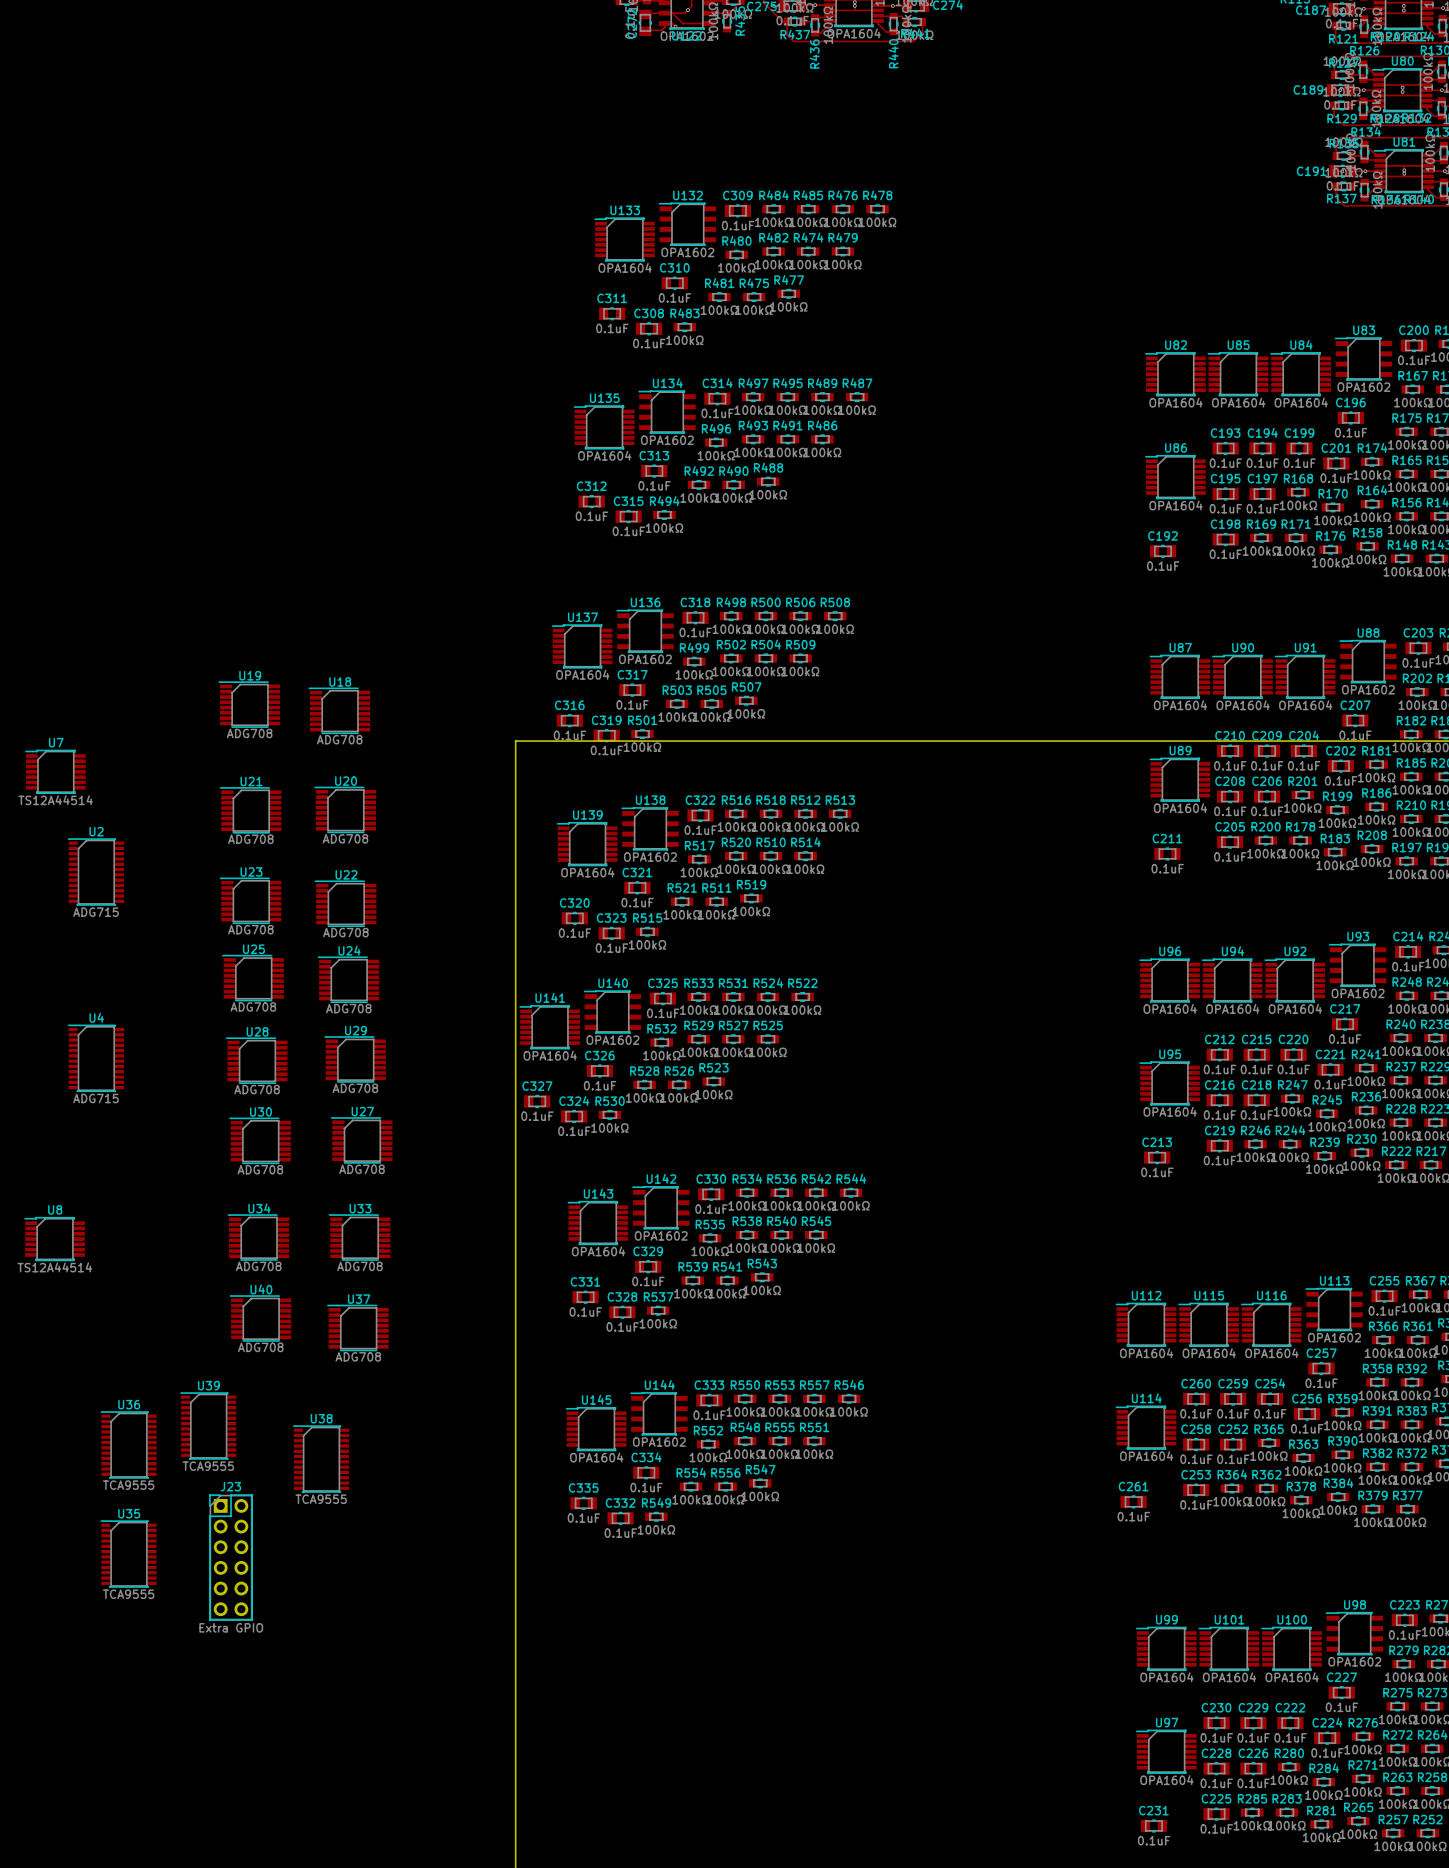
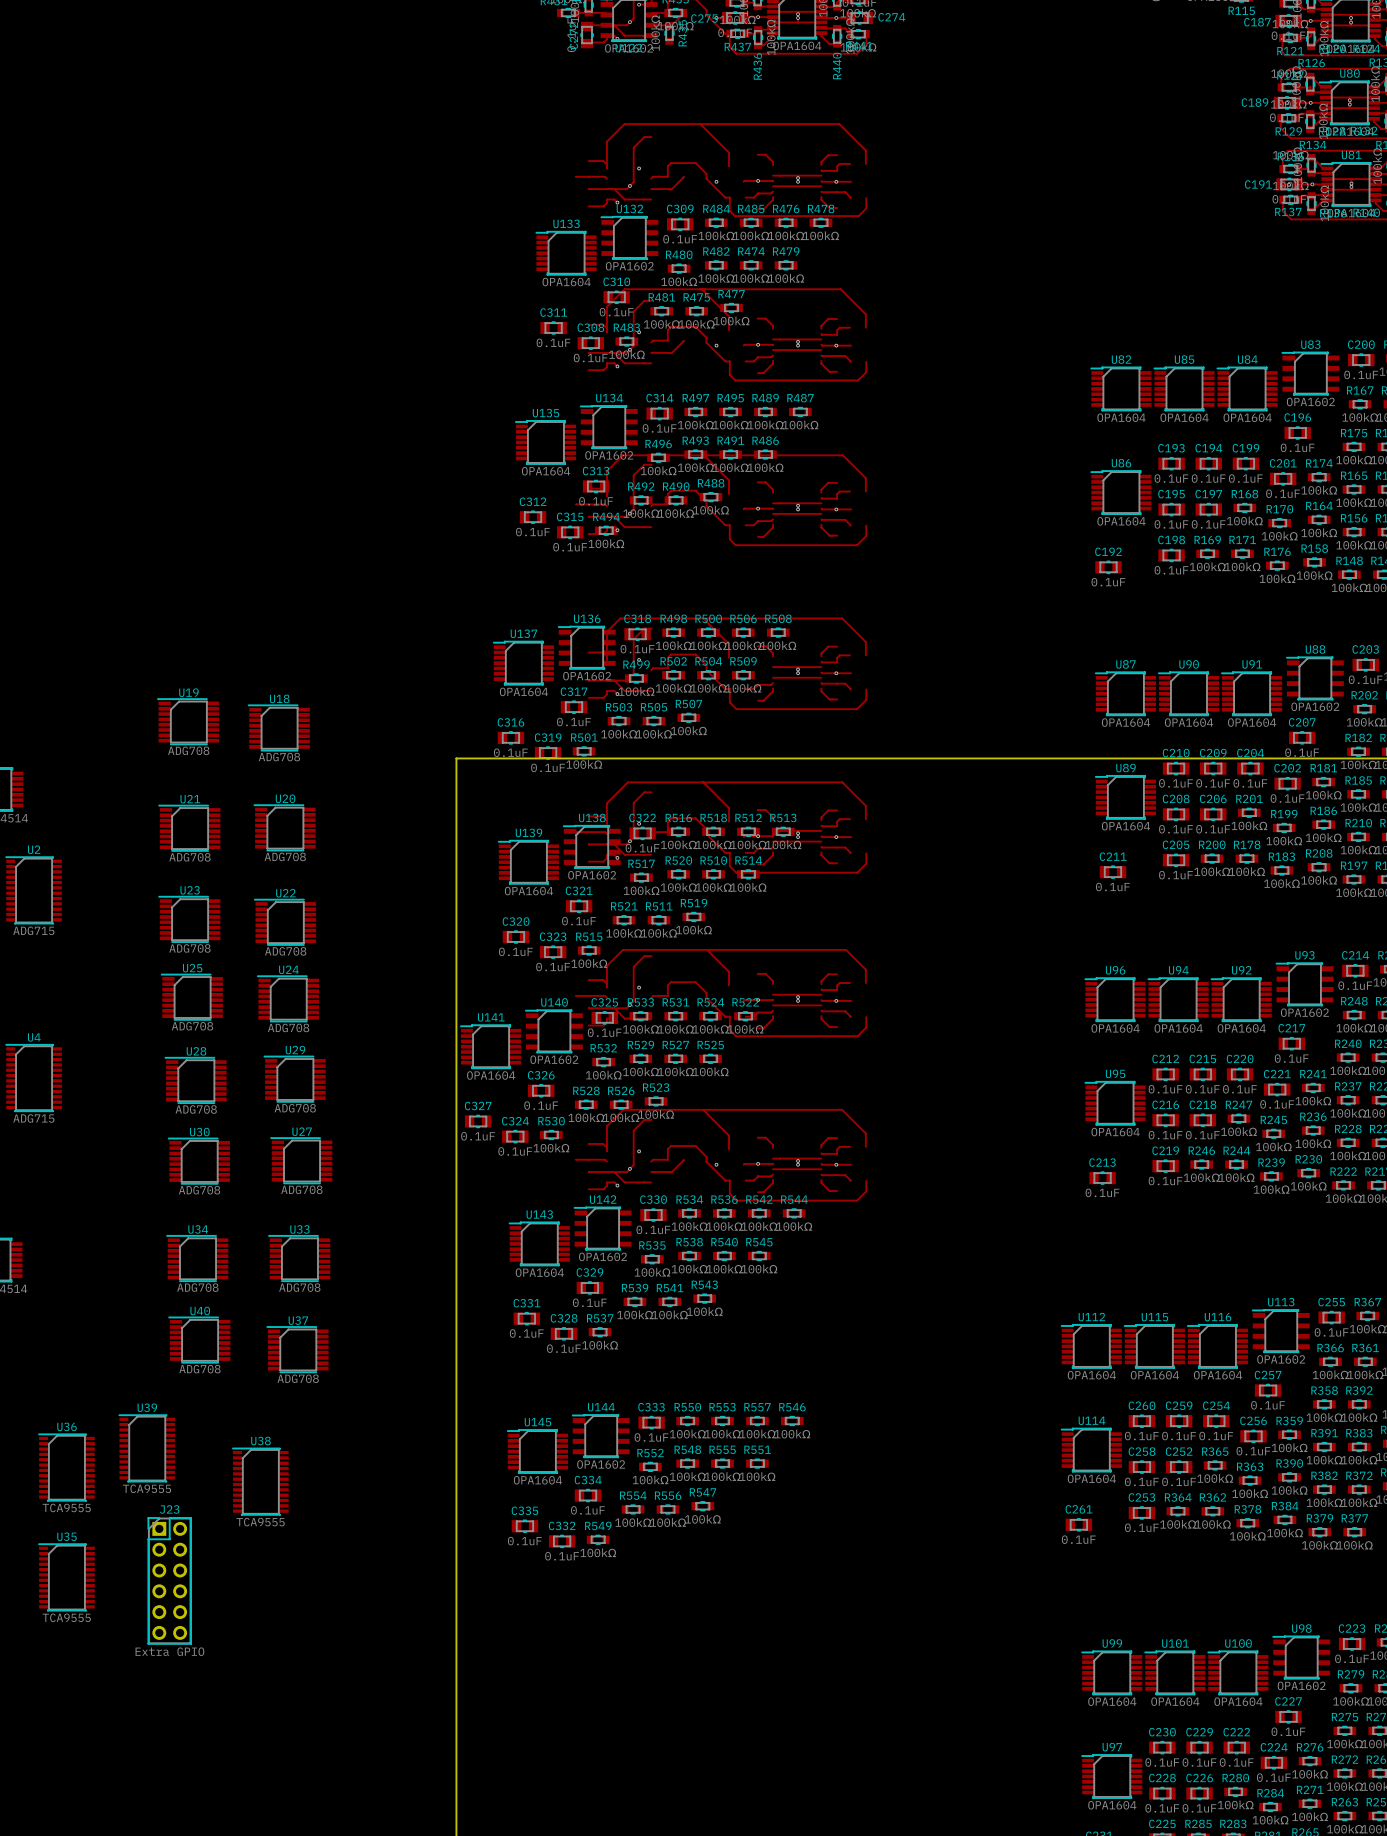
top track: none -> (700, 124) (729, 152) (729, 166)
top track: none -> (651, 137) (644, 137) (633, 147) (633, 182) (626, 189) (588, 189)
top track: none -> (757, 154) (765, 154) (773, 162) (773, 164)
top track: none -> (837, 155) (828, 155) (821, 162) (821, 164)
top track: none -> (588, 161) (603, 161) (606, 164)
top track: none -> (850, 163) (839, 163) (837, 166) (837, 170) (821, 170)
top track: none -> (865, 163) (865, 150) (839, 124) (624, 124) (606, 141) (606, 168)
via: none -> (639, 168)
top track: none -> (773, 175) (821, 175)
top track: none -> (576, 176) (605, 176) (606, 178)
top track: none -> (683, 176) (671, 189) (651, 189)
via: none -> (798, 178)
top track: none -> (651, 178) (653, 176) (667, 176) (667, 166) (671, 163) (695, 163) (706, 173) (706, 178) (725, 197) (729, 197) (729, 211) (734, 216) (858, 216) (866, 208) (866, 198)
via: none -> (758, 180)
top track: none -> (821, 180) (851, 181)
via: none -> (716, 181)
top track: none -> (772, 181) (743, 181)
via: none -> (798, 181)
via: none -> (836, 181)
via: none -> (629, 185)
top track: none -> (773, 186) (821, 186)
top track: none -> (614, 189) (624, 199) (651, 199)
top track: none -> (773, 191) (771, 193) (758, 193) (753, 197) (745, 197)
top track: none -> (821, 191) (845, 192) (850, 198)
top track: none -> (773, 196) (773, 199) (763, 209) (758, 209)
top track: none -> (821, 196) (821, 199) (829, 207) (837, 207)
top track: none -> (617, 202) (614, 199) (606, 199) (606, 202) (603, 206) (588, 206)
via: none -> (617, 202)
top track: none -> (701, 289) (729, 316) (729, 330)
top track: none -> (651, 300) (644, 300) (633, 311) (633, 346) (626, 352) (588, 353)
top track: none -> (757, 318) (765, 318) (773, 325) (773, 328)
top track: none -> (837, 319) (828, 319) (821, 325) (821, 328)
top track: none -> (588, 324) (603, 324) (606, 328)
top track: none -> (850, 327) (839, 327) (837, 330) (837, 334) (821, 334)
top track: none -> (865, 327) (865, 314) (840, 289) (624, 289) (606, 306) (606, 332)
via: none -> (639, 332)
top track: none -> (773, 339) (821, 339)
top track: none -> (683, 340) (671, 353) (651, 352)
via: none -> (798, 341)
top track: none -> (651, 342) (653, 340) (667, 340) (667, 330) (671, 326) (695, 326) (706, 337) (706, 342) (725, 361) (729, 361) (729, 375) (735, 380) (858, 380) (866, 372) (866, 361)
via: none -> (758, 344)
top track: none -> (772, 345) (743, 345)
top track: none -> (821, 344) (851, 345)
via: none -> (716, 345)
via: none -> (798, 345)
via: none -> (836, 345)
via: none -> (629, 349)
top track: none -> (773, 350) (821, 350)
top track: none -> (614, 352) (624, 363) (651, 363)
top track: none -> (773, 355) (771, 357) (758, 357) (753, 361) (745, 361)
top track: none -> (821, 355) (845, 356) (850, 361)
top track: none -> (773, 360) (773, 363) (763, 373) (758, 373)
top track: none -> (821, 360) (821, 363) (829, 371) (837, 371)
top track: none -> (617, 366) (614, 363) (606, 363) (606, 366) (603, 370) (588, 370)
via: none -> (617, 366)
top track: none -> (703, 455) (729, 480) (729, 494)
top track: none -> (651, 464) (644, 464) (633, 475) (633, 509) (626, 516) (588, 516)
top track: none -> (757, 482) (765, 482) (773, 489) (773, 492)
top track: none -> (837, 482) (828, 482) (821, 489) (821, 492)
top track: none -> (588, 488) (603, 488) (606, 492)
top track: none -> (850, 491) (839, 491) (837, 494) (837, 498) (821, 497)
top track: none -> (865, 491) (865, 478) (842, 455) (622, 455) (606, 471) (606, 495)
top track: none -> (773, 503) (821, 503)
top track: none -> (576, 504) (605, 504) (606, 506)
top track: none -> (651, 506) (653, 504) (667, 504) (667, 494) (671, 490) (695, 490) (706, 501) (706, 506) (725, 525) (729, 525) (729, 539) (735, 545) (857, 545) (866, 536) (866, 525)
via: none -> (798, 505)
via: none -> (758, 508)
top track: none -> (772, 509) (743, 509)
via: none -> (798, 509)
top track: none -> (821, 508) (851, 509)
via: none -> (836, 509)
via: none -> (629, 513)
top track: none -> (773, 513) (821, 513)
top track: none -> (614, 516) (624, 527) (651, 527)
top track: none -> (773, 519) (771, 521) (758, 521) (753, 525) (745, 525)
top track: none -> (821, 519) (845, 519) (850, 525)
top track: none -> (773, 524) (773, 527) (763, 536) (758, 536)
top track: none -> (821, 524) (821, 527) (829, 535) (837, 535)
top track: none -> (617, 530) (614, 527) (606, 527) (606, 530) (603, 534) (588, 534)
via: none -> (617, 530)
top track: none -> (703, 618) (729, 644) (729, 657)
top track: none -> (651, 628) (644, 628) (633, 639) (633, 673) (626, 680) (588, 680)
top track: none -> (757, 646) (765, 646) (773, 653) (773, 656)
top track: none -> (837, 646) (828, 646) (821, 653) (821, 656)
top track: none -> (588, 652) (603, 652) (606, 656)
top track: none -> (850, 655) (839, 655) (837, 657) (837, 662) (821, 661)
top track: none -> (865, 655) (865, 642) (842, 618) (620, 618) (606, 631) (606, 659)
via: none -> (639, 659)
top track: none -> (773, 667) (821, 667)
via: none -> (798, 669)
top track: none -> (651, 670) (653, 668) (667, 668) (667, 657) (671, 654) (695, 654) (706, 665) (706, 670) (725, 689) (729, 689) (729, 702) (736, 709) (857, 709) (866, 699) (866, 689)
top track: none -> (821, 672) (851, 673)
via: none -> (798, 673)
via: none -> (836, 673)
top track: none -> (773, 677) (821, 677)
top track: none -> (614, 680) (624, 690) (651, 690)
top track: none -> (773, 683) (771, 684) (758, 684) (753, 689) (745, 689)
top track: none -> (821, 683) (845, 683) (850, 689)
top track: none -> (773, 688) (773, 691) (763, 700) (758, 700)
top track: none -> (821, 688) (821, 691) (829, 699) (837, 699)
top track: none -> (617, 694) (614, 690) (606, 690) (606, 694) (603, 697) (588, 697)
via: none -> (617, 694)
top track: none -> (703, 782) (729, 807) (729, 821)
top track: none -> (651, 792) (644, 792) (633, 803) (633, 837) (626, 844) (588, 844)
top track: none -> (757, 810) (765, 810) (773, 817) (773, 820)
top track: none -> (837, 810) (828, 810) (821, 817) (821, 820)
top track: none -> (588, 816) (603, 816) (606, 820)
top track: none -> (850, 819) (839, 819) (837, 821) (837, 826) (821, 825)
top track: none -> (865, 819) (865, 805) (842, 782) (627, 782) (606, 803) (606, 823)
via: none -> (639, 823)
top track: none -> (773, 830) (821, 830)
top track: none -> (576, 832) (605, 832) (606, 833)
via: none -> (798, 833)
top track: none -> (651, 833) (653, 832) (667, 832) (667, 821) (671, 818) (695, 818) (706, 829) (706, 834) (725, 852) (729, 852) (729, 866) (736, 872) (857, 872) (866, 863) (866, 853)
via: none -> (758, 836)
top track: none -> (772, 836) (743, 837)
top track: none -> (821, 836) (851, 837)
via: none -> (798, 837)
via: none -> (836, 837)
via: none -> (629, 841)
top track: none -> (773, 841) (821, 841)
top track: none -> (614, 844) (624, 854) (651, 854)
top track: none -> (773, 846) (771, 848) (758, 848) (753, 852) (745, 852)
top track: none -> (821, 846) (845, 847) (850, 853)
top track: none -> (773, 852) (773, 855) (763, 864) (758, 864)
top track: none -> (821, 852) (821, 855) (829, 863) (837, 863)
top track: none -> (617, 857) (614, 854) (606, 854) (606, 858) (603, 861) (588, 861)
via: none -> (617, 857)
top track: none -> (707, 949) (729, 971) (729, 985)
top track: none -> (651, 956) (644, 956) (633, 966) (633, 1001) (626, 1008) (588, 1008)
top track: none -> (757, 973) (765, 973) (773, 981) (773, 984)
top track: none -> (837, 974) (828, 974) (821, 981) (821, 984)
top track: none -> (588, 980) (603, 980) (606, 983)
top track: none -> (850, 983) (839, 983) (837, 985) (837, 990) (821, 989)
top track: none -> (865, 983) (865, 969) (846, 949) (623, 949) (606, 965) (606, 987)
via: none -> (639, 987)
top track: none -> (773, 994) (821, 994)
top track: none -> (576, 995) (605, 995) (606, 997)
top track: none -> (651, 997) (653, 995) (667, 995) (667, 985) (671, 982) (695, 982) (706, 993) (706, 997) (725, 1016) (729, 1016) (729, 1030) (735, 1036) (857, 1036) (866, 1027) (866, 1017)
via: none -> (798, 997)
via: none -> (758, 1000)
top track: none -> (821, 1000) (851, 1000)
top track: none -> (772, 1000) (743, 1000)
via: none -> (798, 1000)
via: none -> (836, 1000)
via: none -> (629, 1005)
top track: none -> (773, 1005) (821, 1005)
top track: none -> (614, 1008) (624, 1018) (651, 1018)
top track: none -> (773, 1010) (771, 1012) (758, 1012) (753, 1016) (745, 1016)
top track: none -> (821, 1010) (845, 1011) (850, 1017)
top track: none -> (773, 1016) (773, 1018) (763, 1028) (758, 1028)
top track: none -> (821, 1016) (821, 1018) (829, 1027) (837, 1027)
top track: none -> (617, 1021) (614, 1018) (606, 1018) (606, 1022) (603, 1025) (588, 1025)
top track: none -> (703, 1109) (729, 1135) (729, 1149)
top track: none -> (651, 1120) (644, 1120) (633, 1130) (633, 1165) (626, 1172) (588, 1172)
top track: none -> (757, 1137) (765, 1137) (773, 1145) (773, 1147)
top track: none -> (837, 1138) (828, 1138) (821, 1145) (821, 1147)
top track: none -> (588, 1143) (603, 1143) (606, 1147)
top track: none -> (850, 1146) (839, 1146) (837, 1149) (837, 1153) (821, 1153)
top track: none -> (865, 1146) (865, 1133) (842, 1109) (623, 1109) (606, 1126) (606, 1151)
via: none -> (639, 1151)
top track: none -> (773, 1158) (821, 1158)
top track: none -> (576, 1159) (605, 1159) (606, 1161)
top track: none -> (683, 1159) (671, 1172) (651, 1172)
via: none -> (798, 1161)
top track: none -> (651, 1161) (653, 1159) (667, 1159) (667, 1149) (671, 1146) (695, 1146) (706, 1156) (706, 1161) (725, 1180) (729, 1180) (729, 1193) (736, 1200) (857, 1200) (866, 1191) (866, 1180)
via: none -> (758, 1163)
top track: none -> (821, 1163) (851, 1164)
via: none -> (716, 1164)
top track: none -> (772, 1164) (743, 1164)
via: none -> (798, 1164)
via: none -> (836, 1164)
via: none -> (629, 1168)
top track: none -> (773, 1169) (821, 1169)
top track: none -> (614, 1172) (624, 1182) (651, 1182)
top track: none -> (773, 1174) (771, 1176) (758, 1176) (753, 1180) (745, 1180)
top track: none -> (821, 1174) (845, 1175) (850, 1180)
top track: none -> (773, 1179) (773, 1182) (763, 1192) (758, 1192)
top track: none -> (821, 1179) (821, 1182) (829, 1190) (837, 1190)
top track: none -> (617, 1185) (614, 1182) (606, 1182) (606, 1185) (603, 1189) (588, 1189)
via: none -> (617, 1185)

